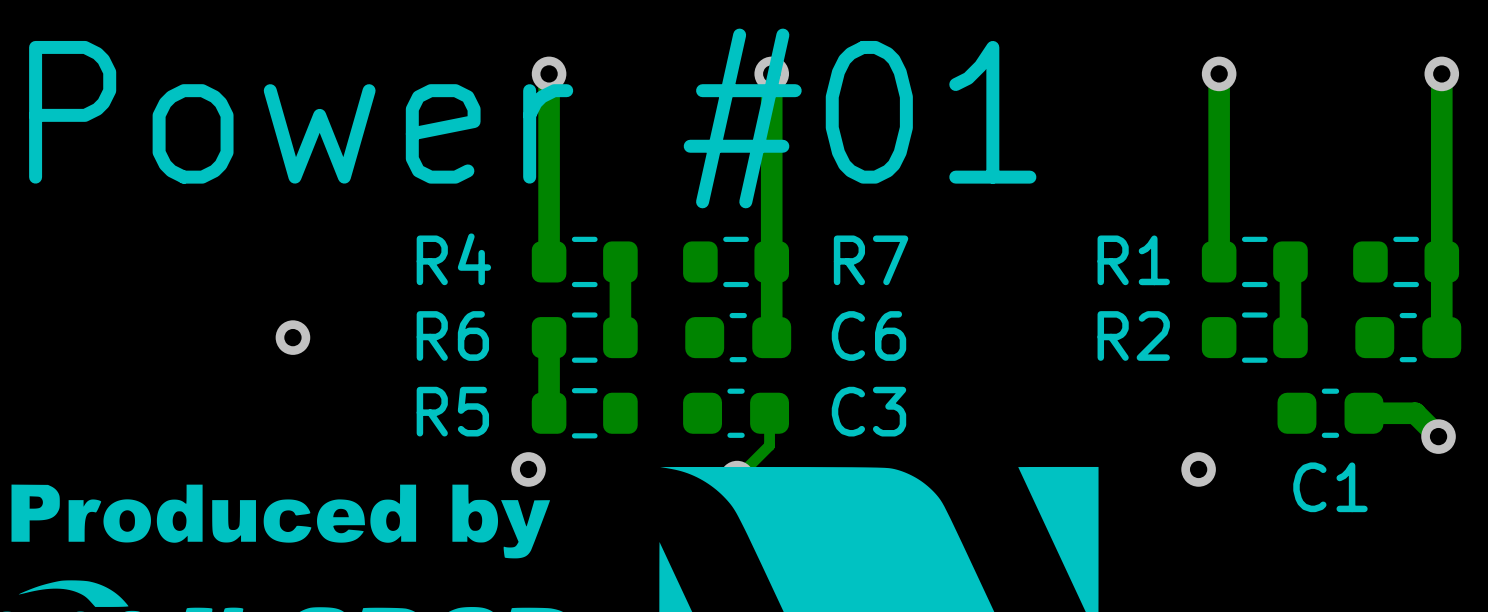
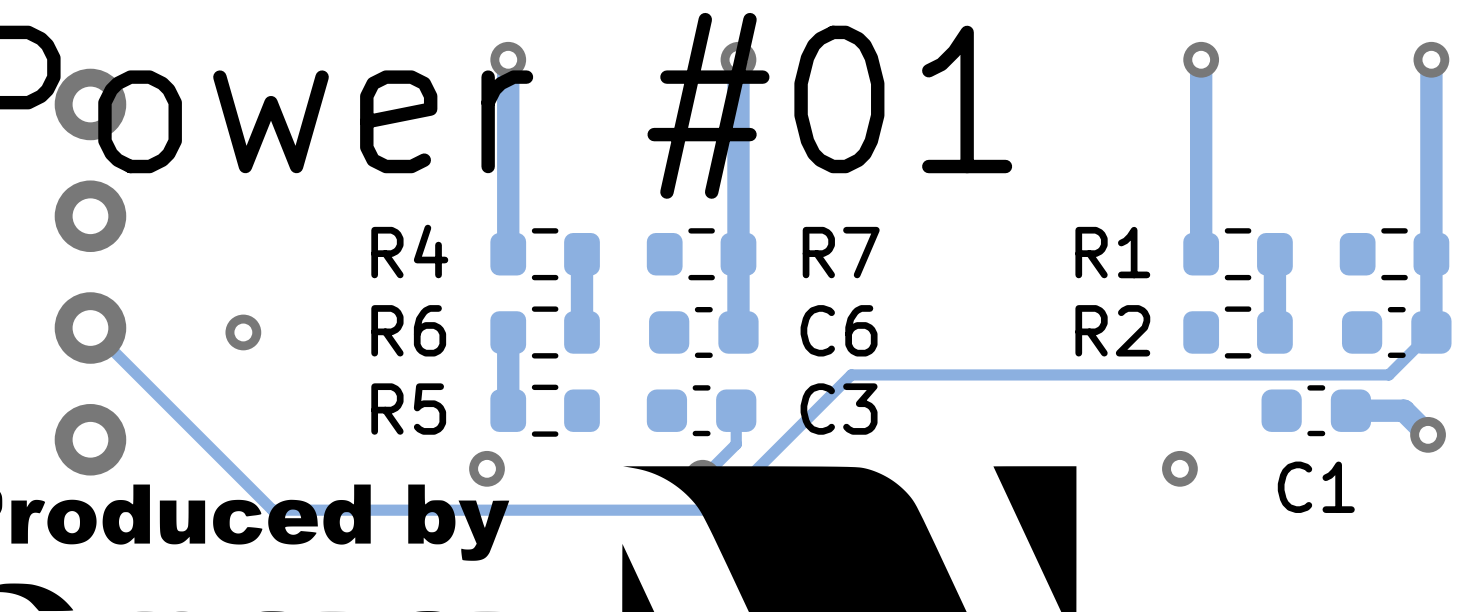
via: none -> (90, 104)
via: none -> (90, 216)
track: none -> (90, 328) (272, 510) (716, 510) (851, 374) (1388, 374) (1431, 332)
via: none -> (90, 328)
via: none -> (90, 439)

